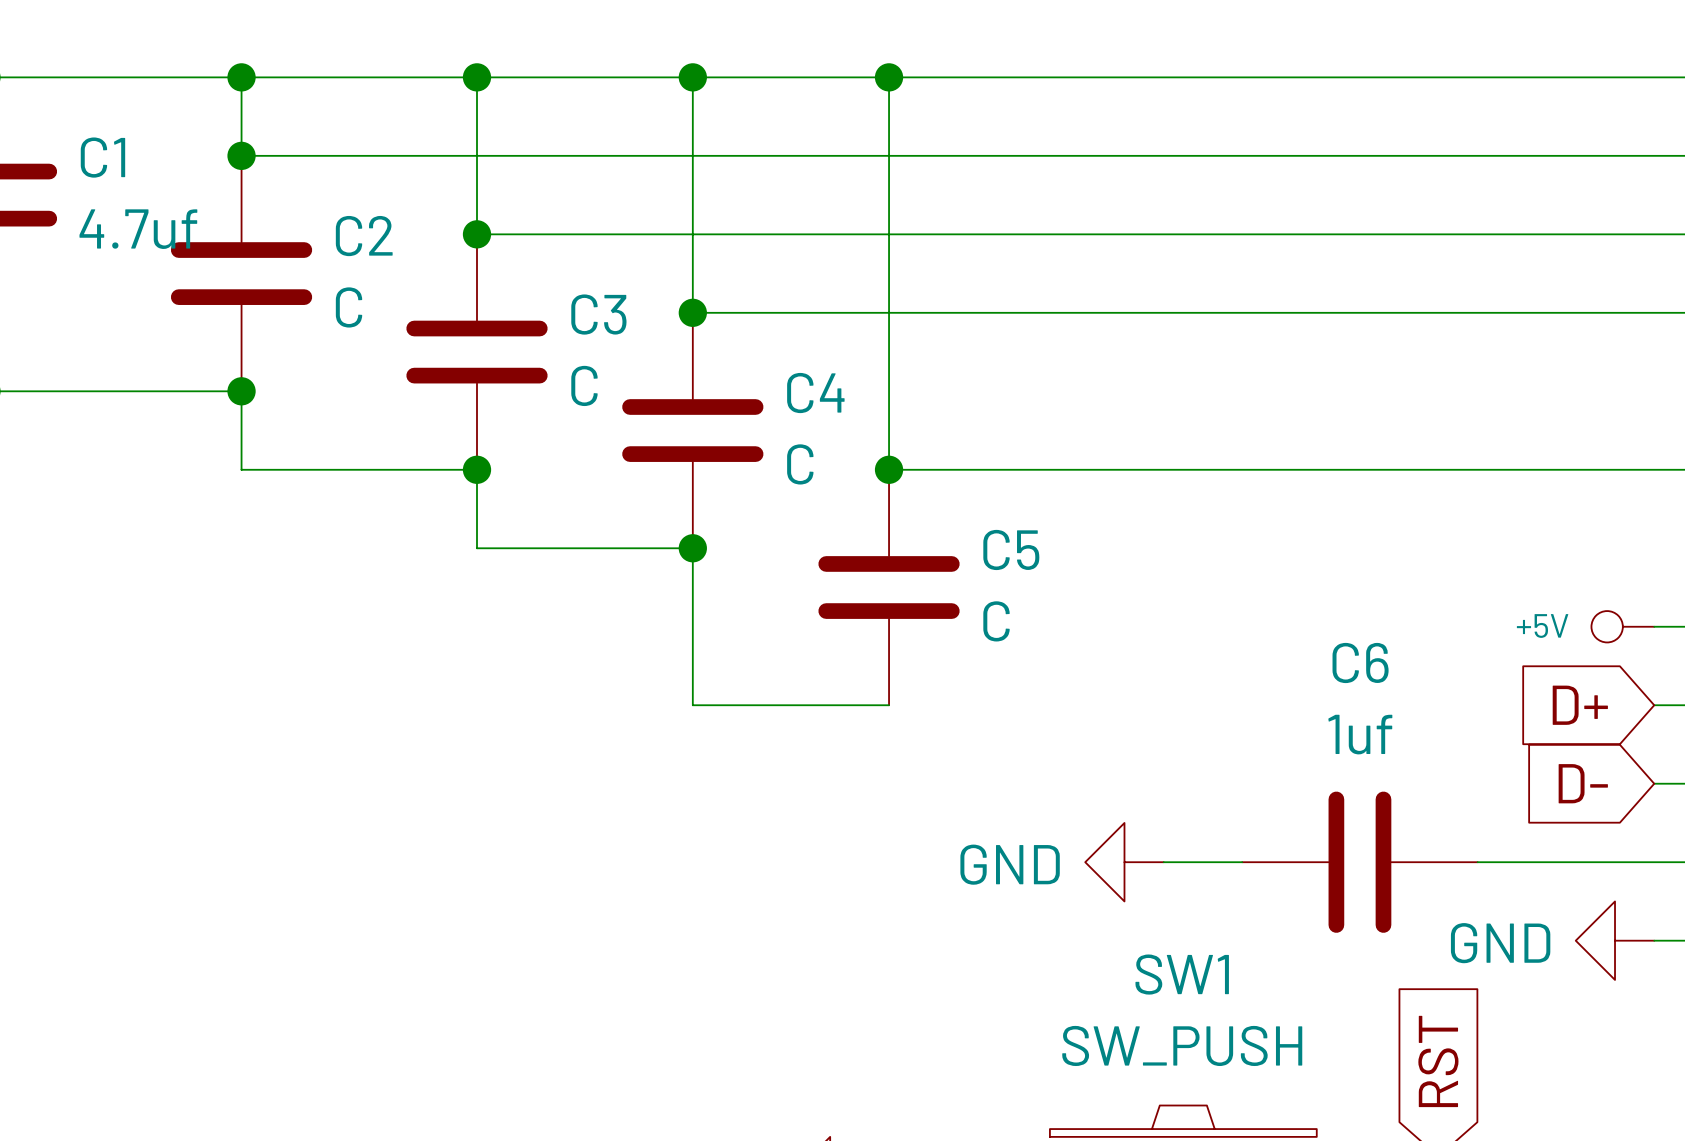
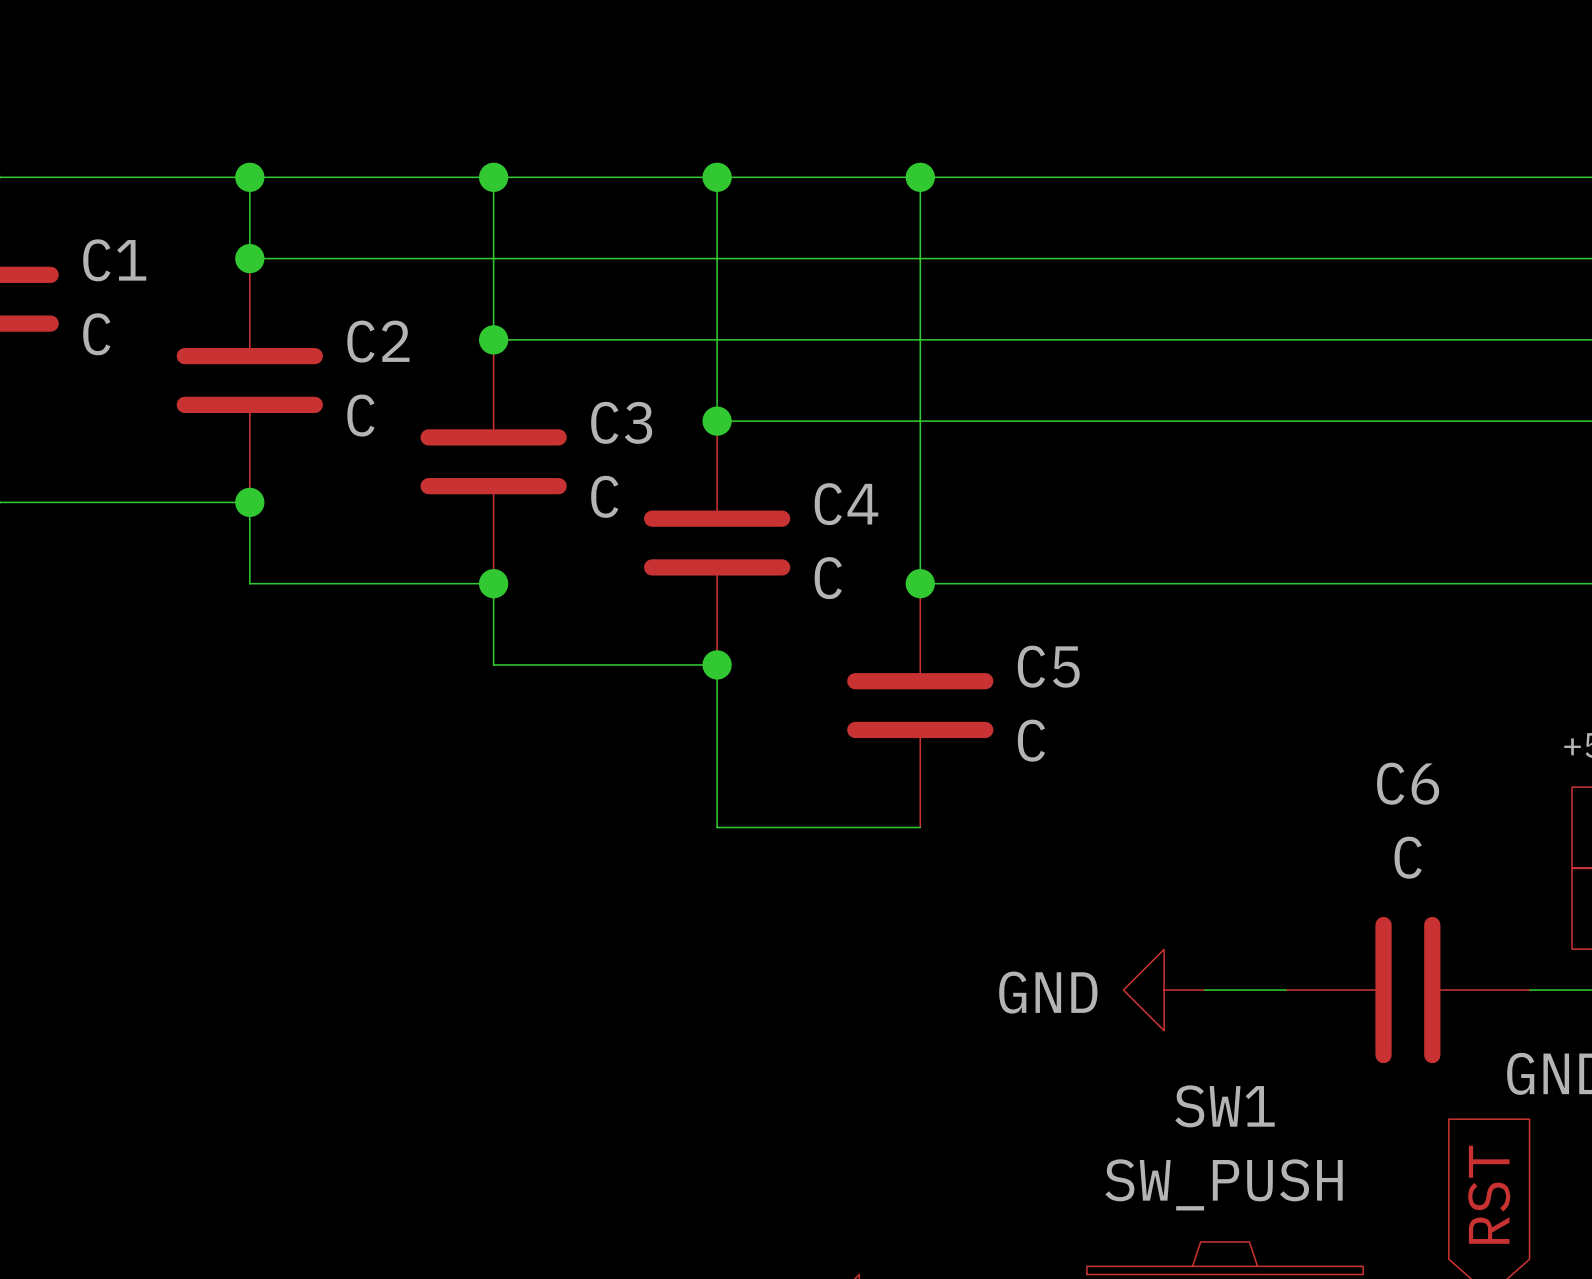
C1 value: 4.7uf (138, 229) -> C (96, 334)
C6 value: 1uf (1360, 734) -> C (1408, 857)

